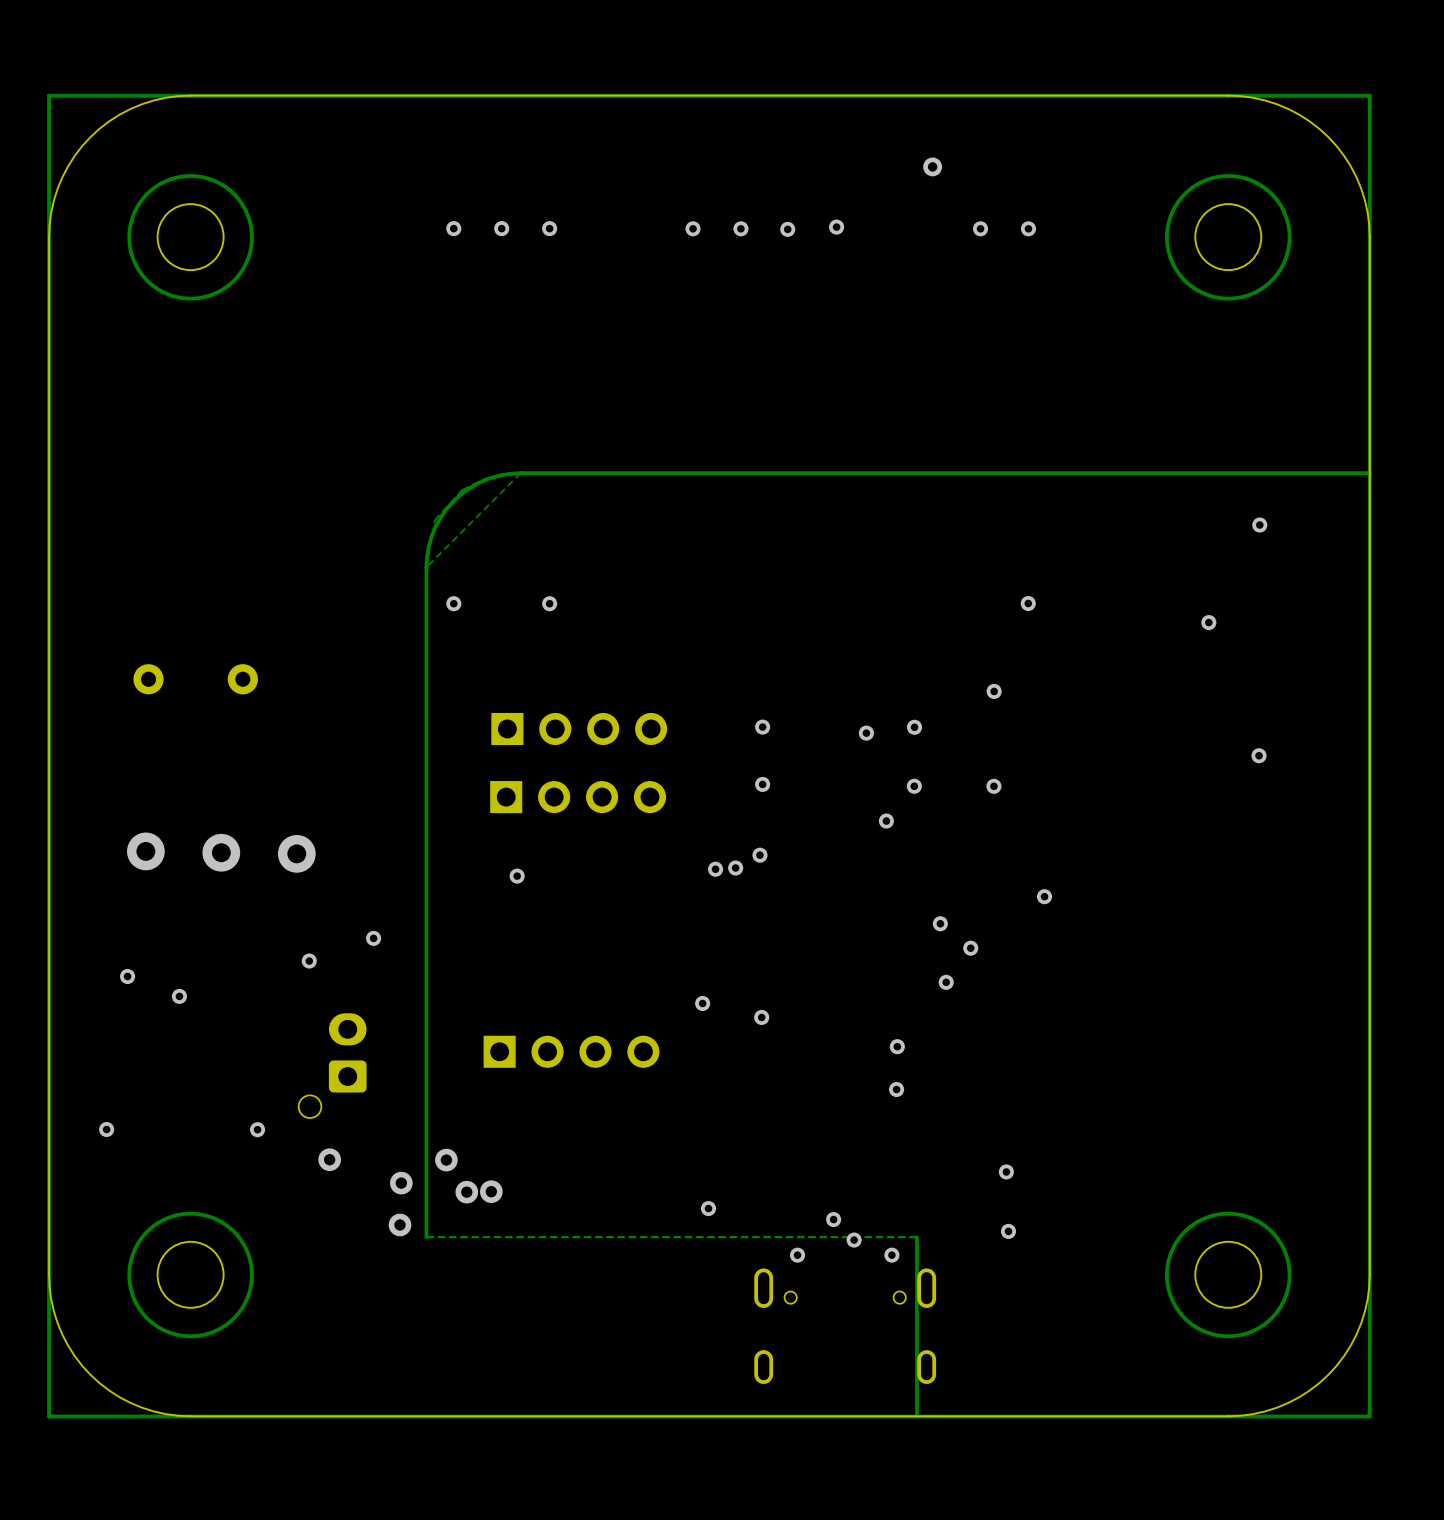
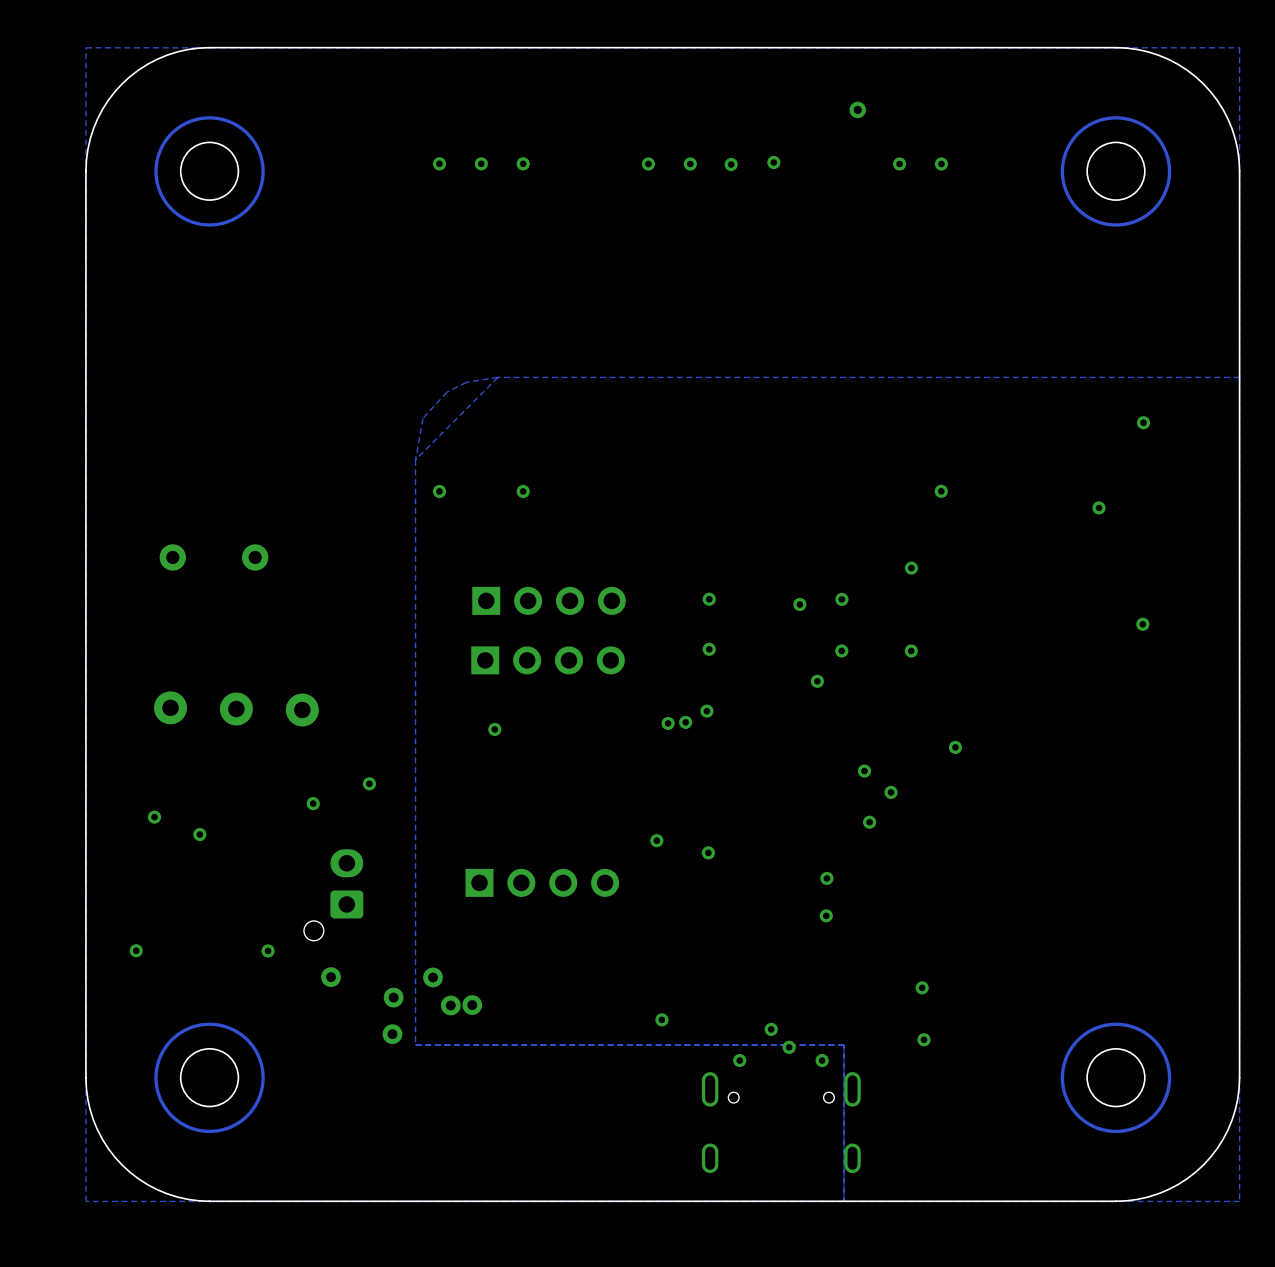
track: (1369, 95) (49, 95) (49, 1416) (1369, 1416) (1369, 95) -> none
track: (1369, 473) (520, 473) (489, 478) (461, 493) (447, 508) (435, 526) (428, 546) (426, 567) (426, 1237) -> none
track: (916, 1237) (916, 1416) -> none

